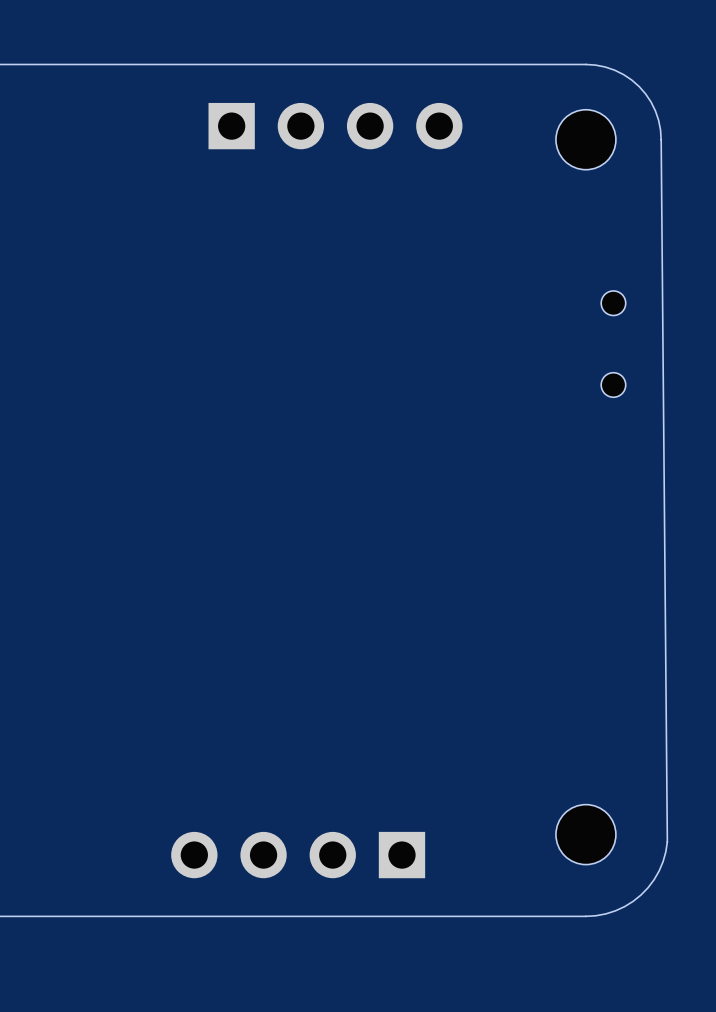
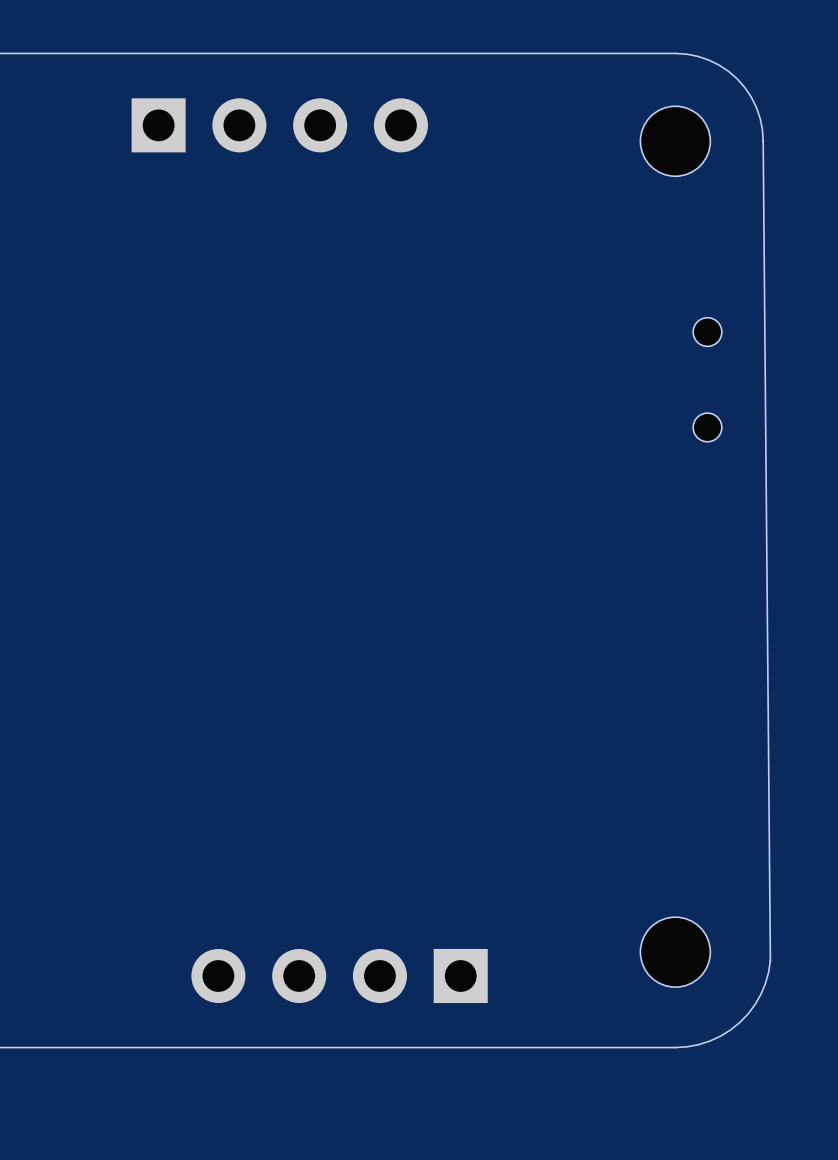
part position: (335, 126) -> (279, 125)

